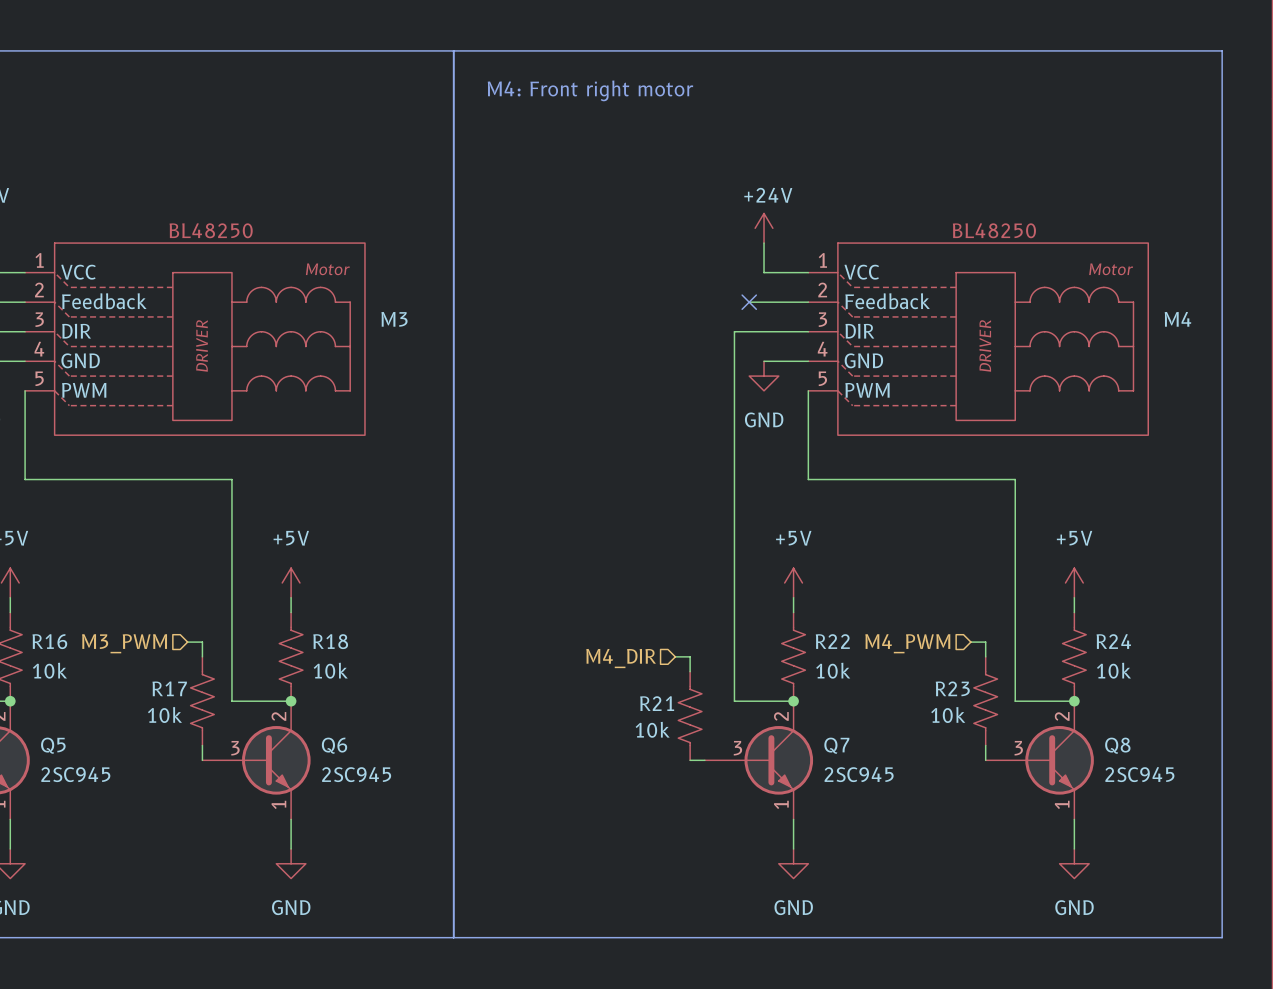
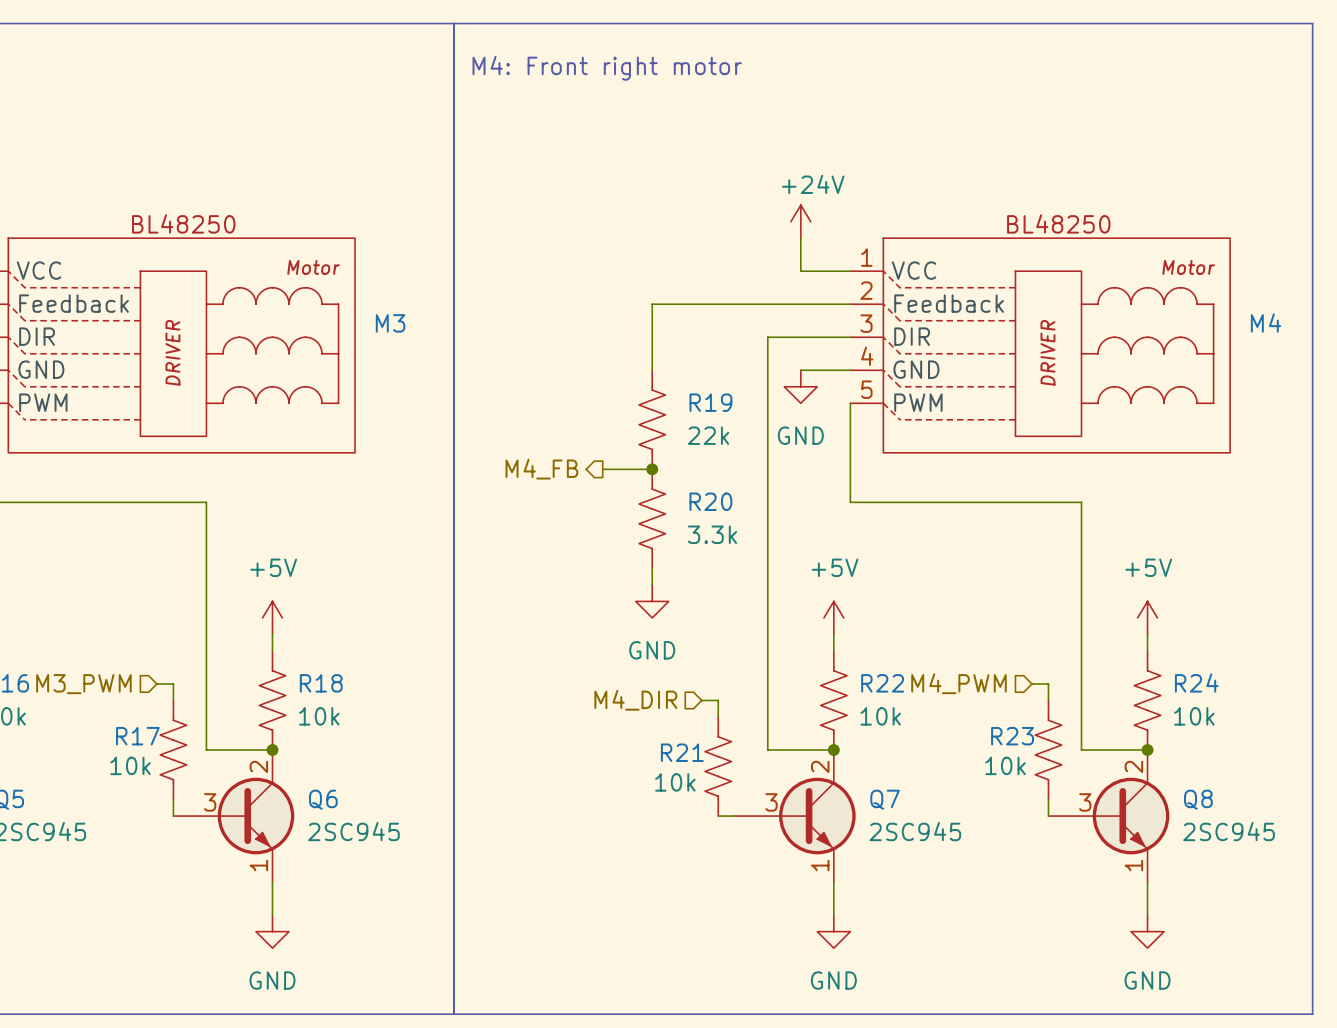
wire: none -> (784, 304) (652, 304) (652, 370)
no-connect mark: (749, 302) -> none
R19: none -> 22k (652, 419)
wire: none -> (602, 469) (652, 469)
junction: none -> (652, 469)
hierarchical label: none -> M4_FB (541, 469)
R20: none -> 3.3k (652, 518)
wire: none -> (652, 568) (652, 584)
power symbol: none -> GND (652, 601)

